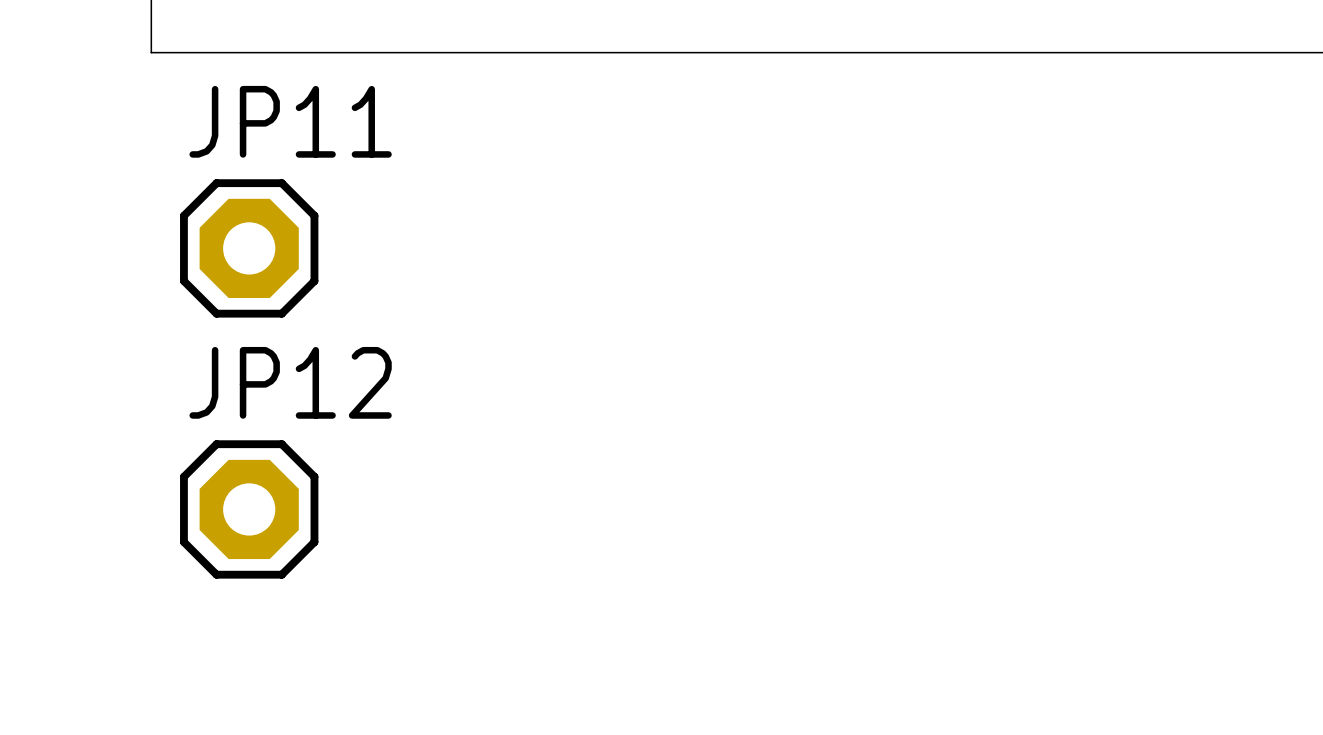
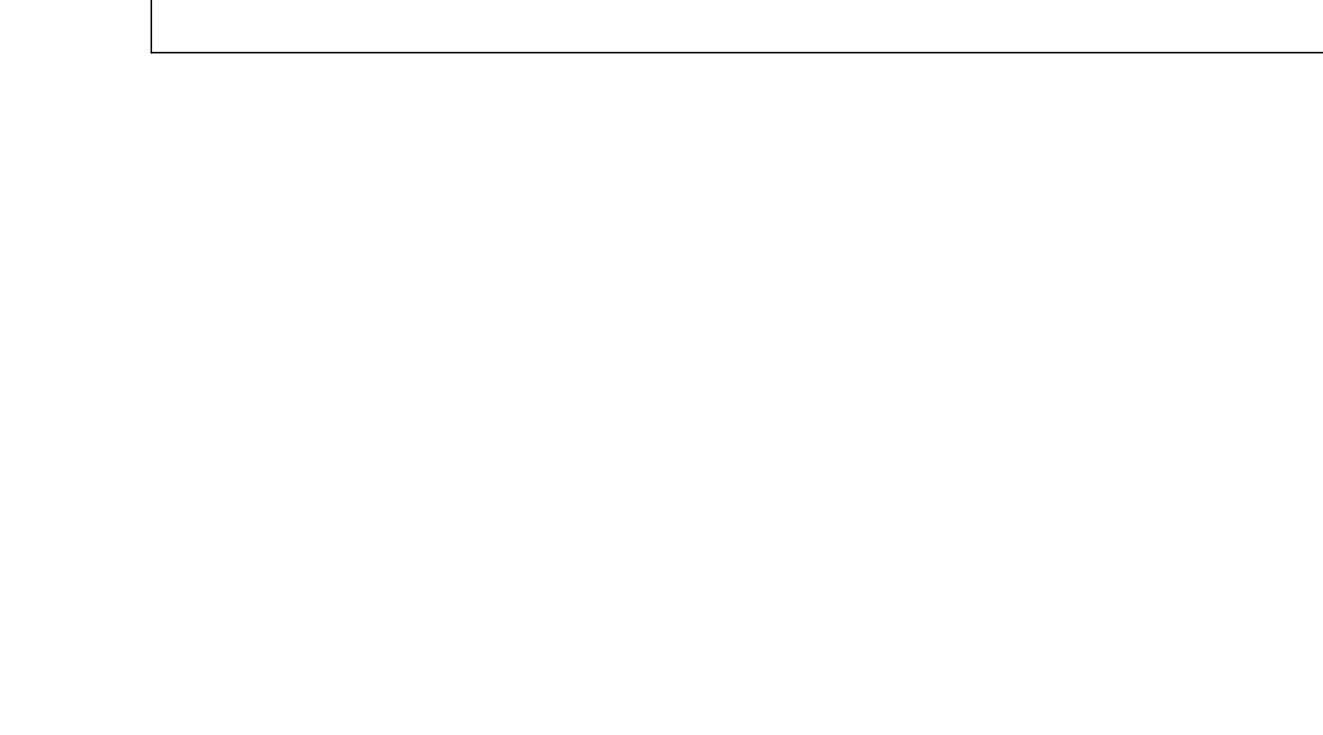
JP11: (249, 248) -> none
JP12: (249, 509) -> none

